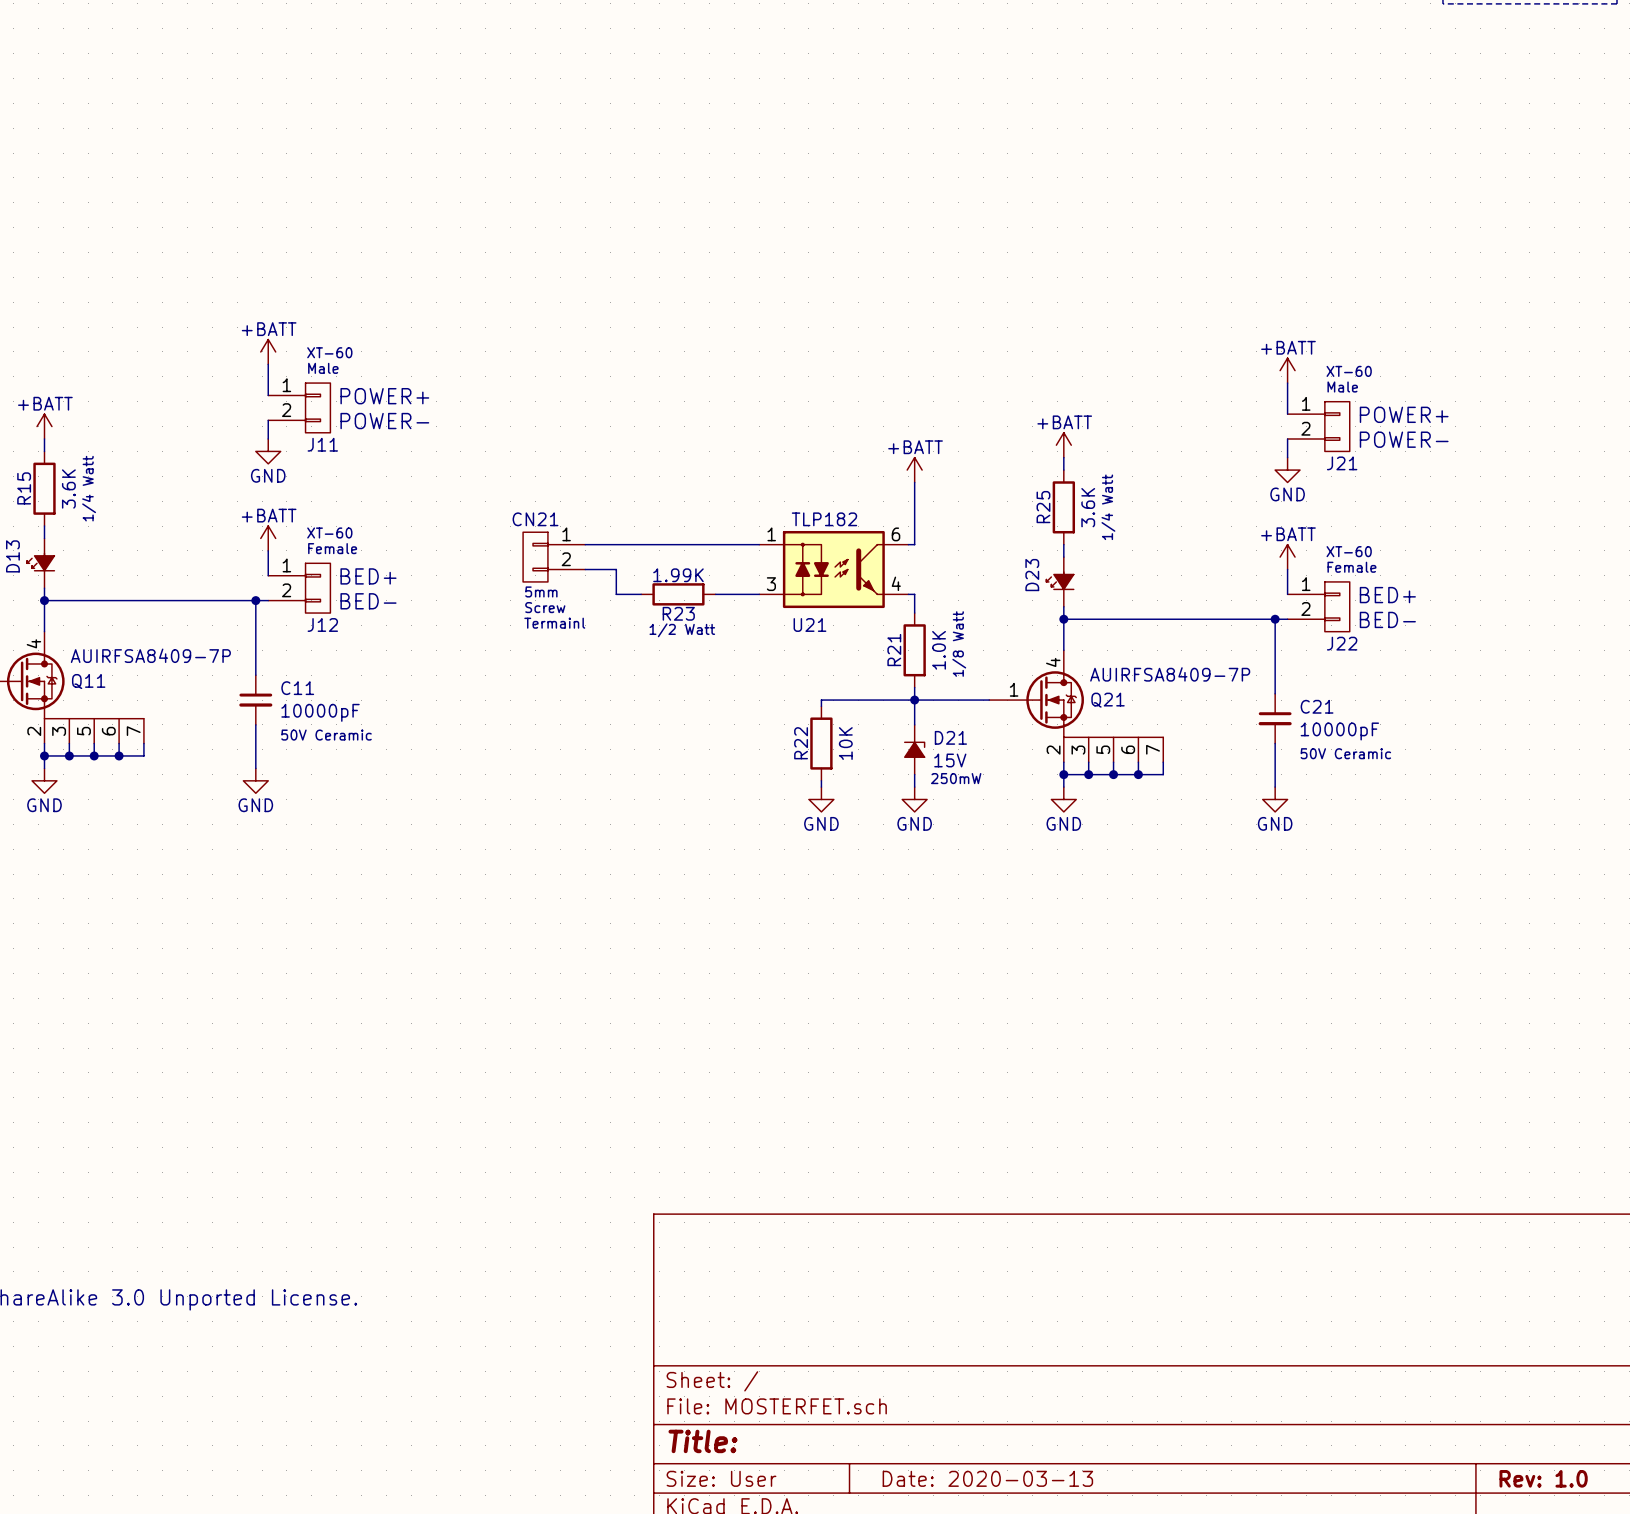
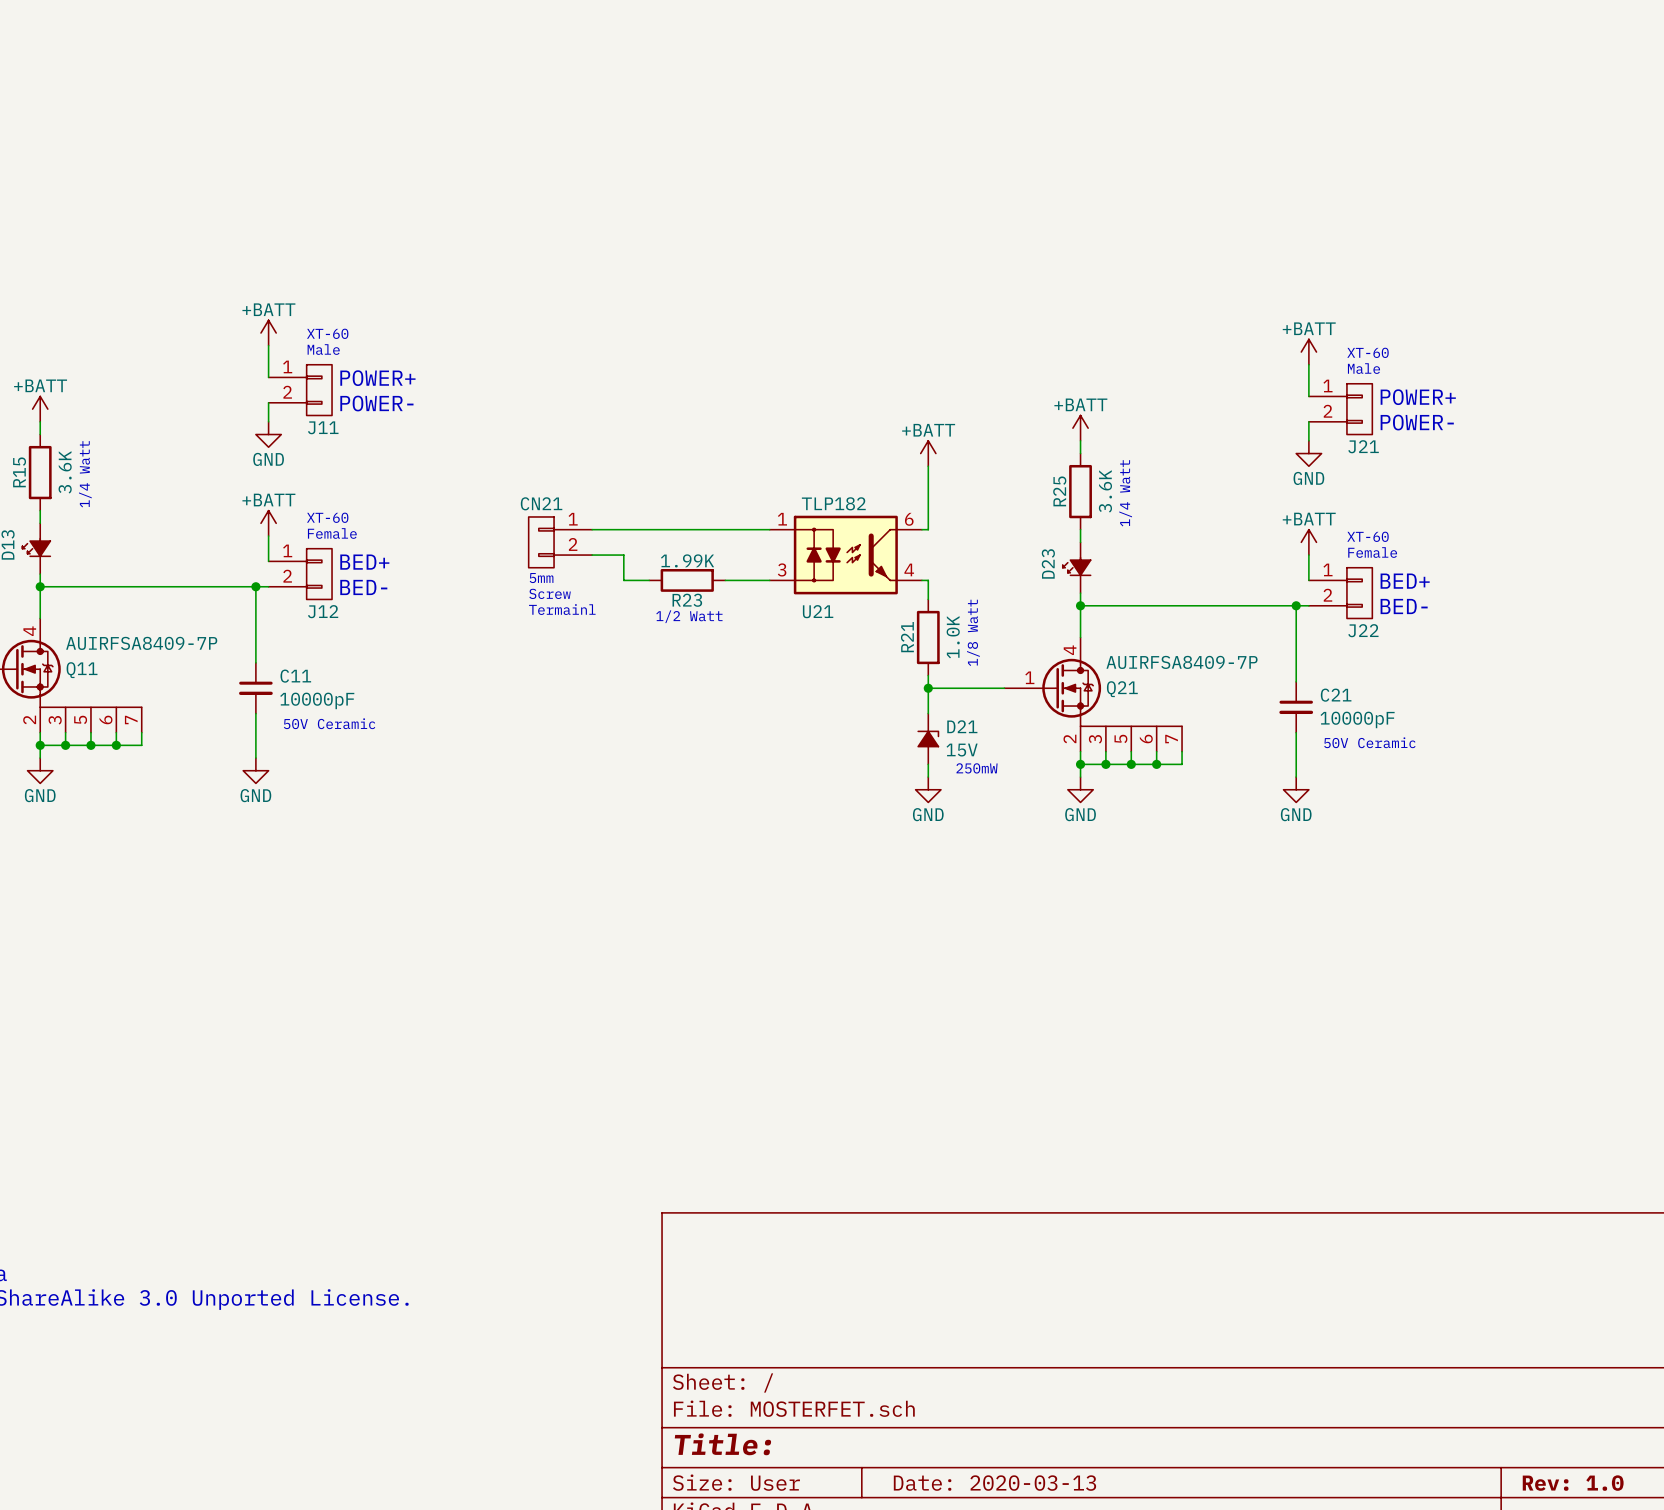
wire: (914, 700) (821, 700) (821, 706) -> none
R22: 10K (821, 743) -> none
wire: (821, 780) (821, 787) -> none
power symbol: GND (821, 799) -> none

